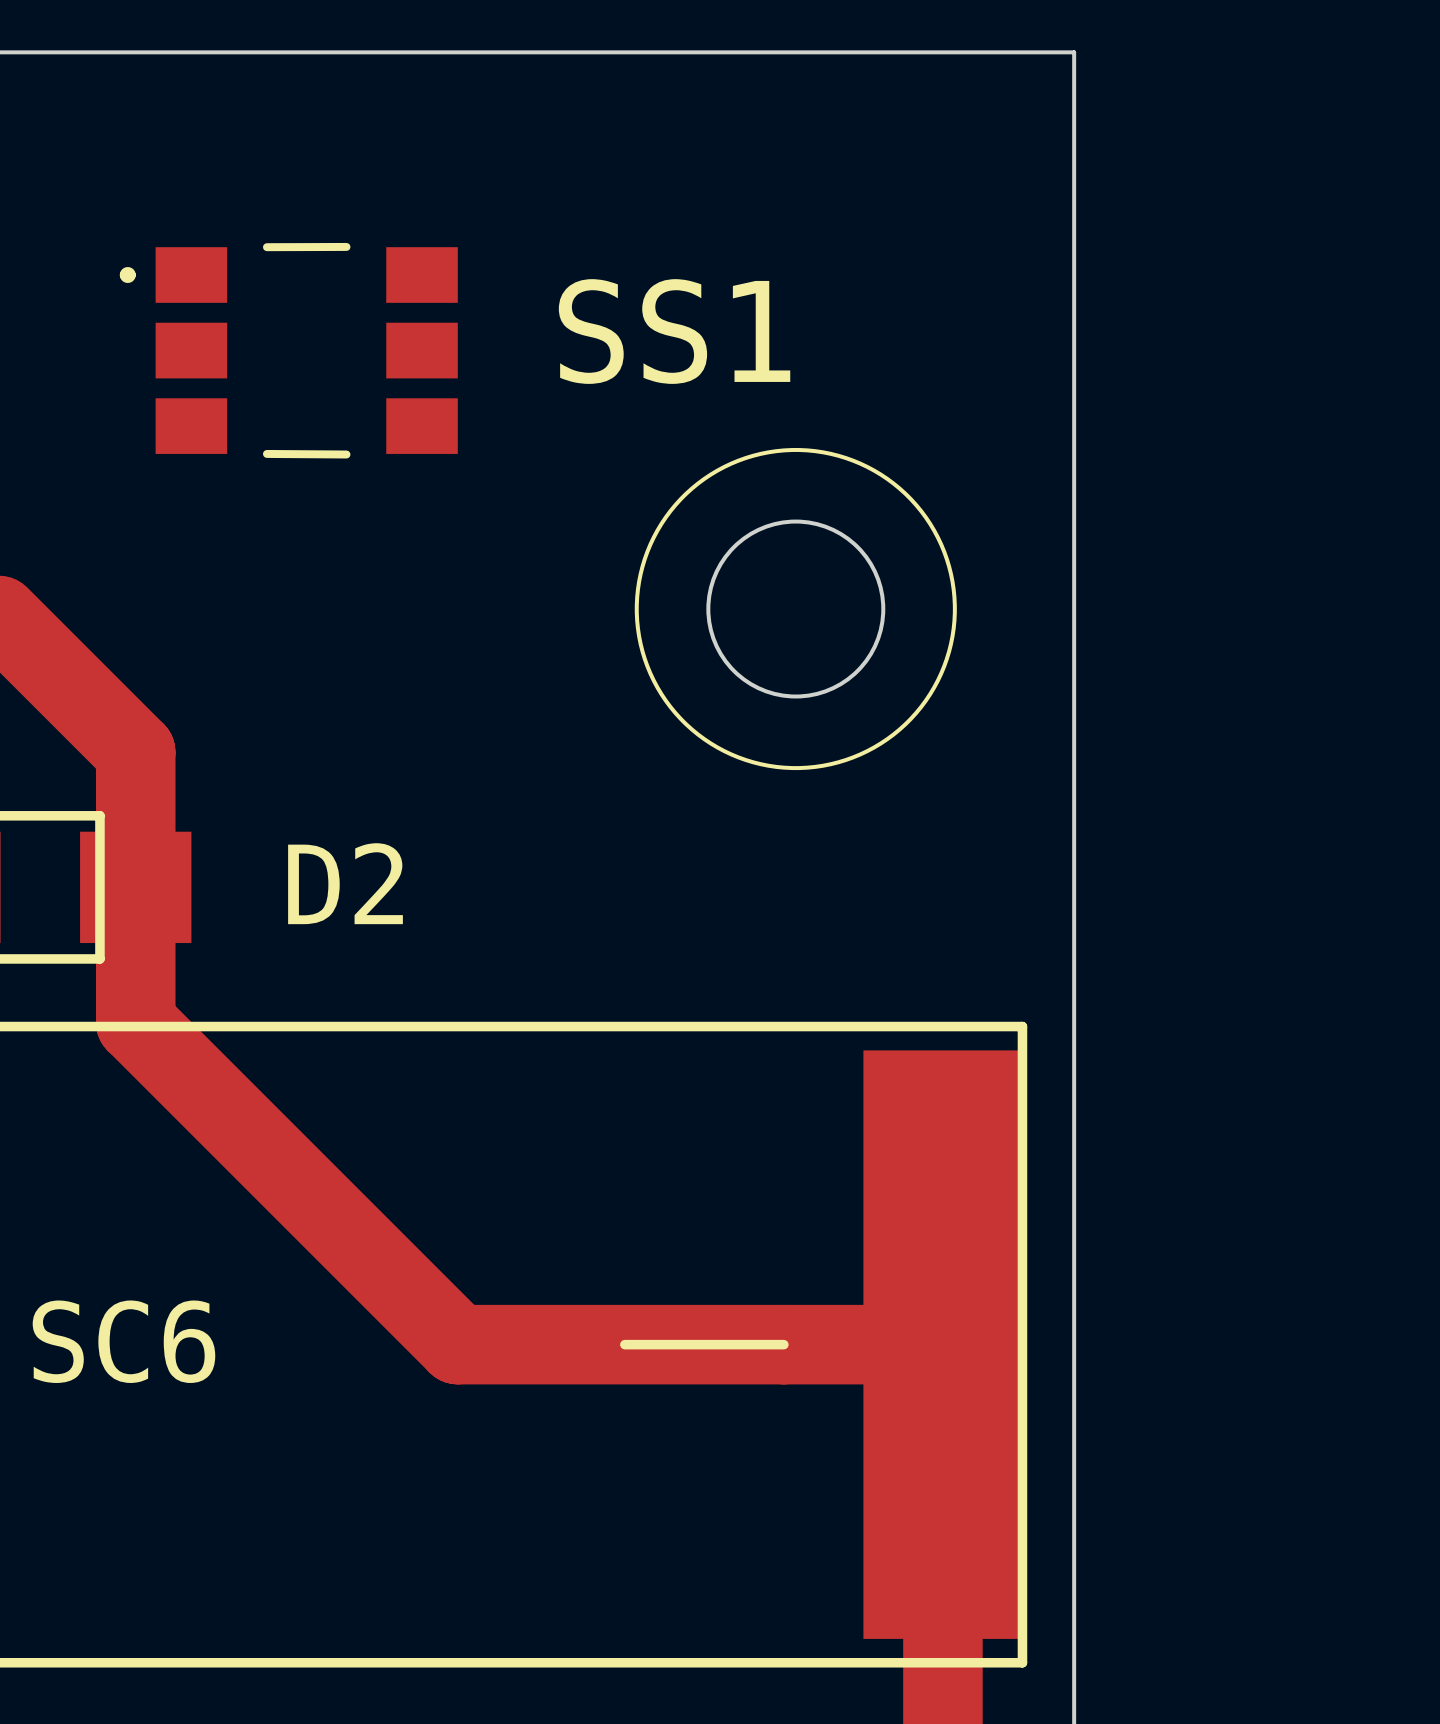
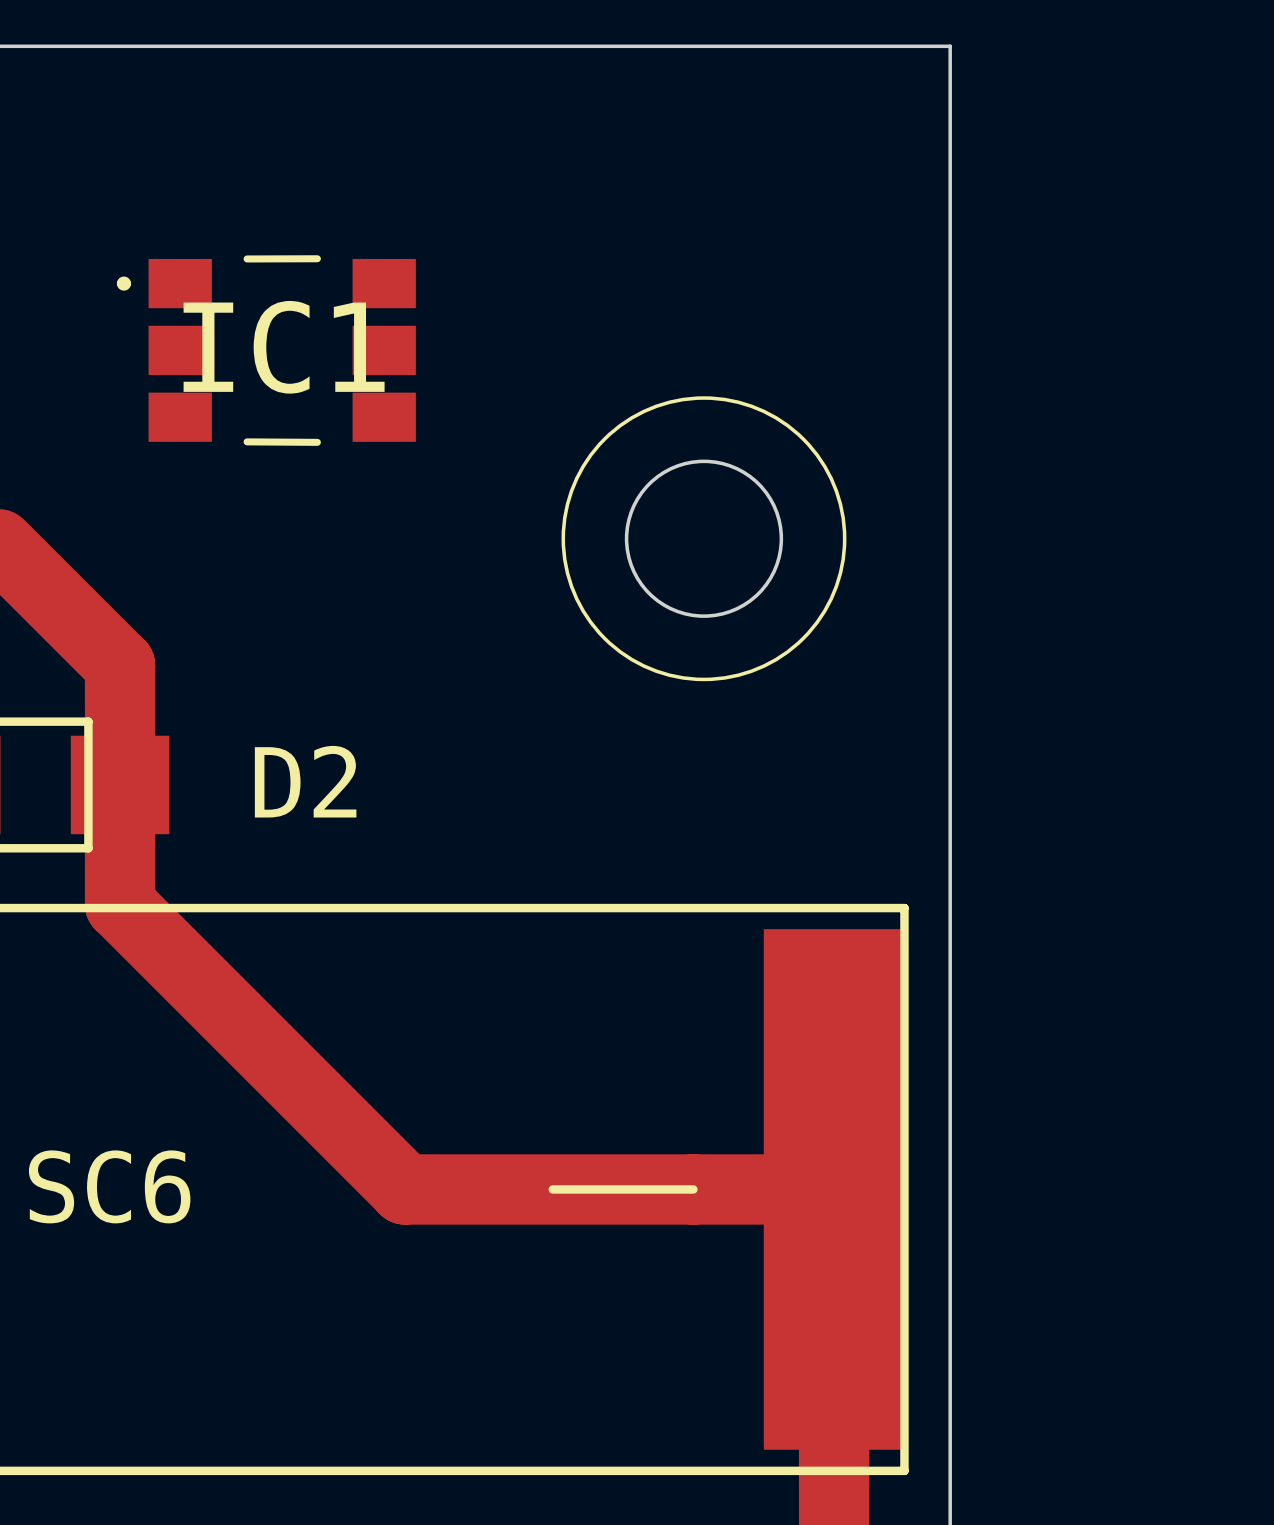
SS1 name: SS1 (674, 331) -> IC1 (284, 347)
SS1 position: (288, 350) -> (266, 350)

